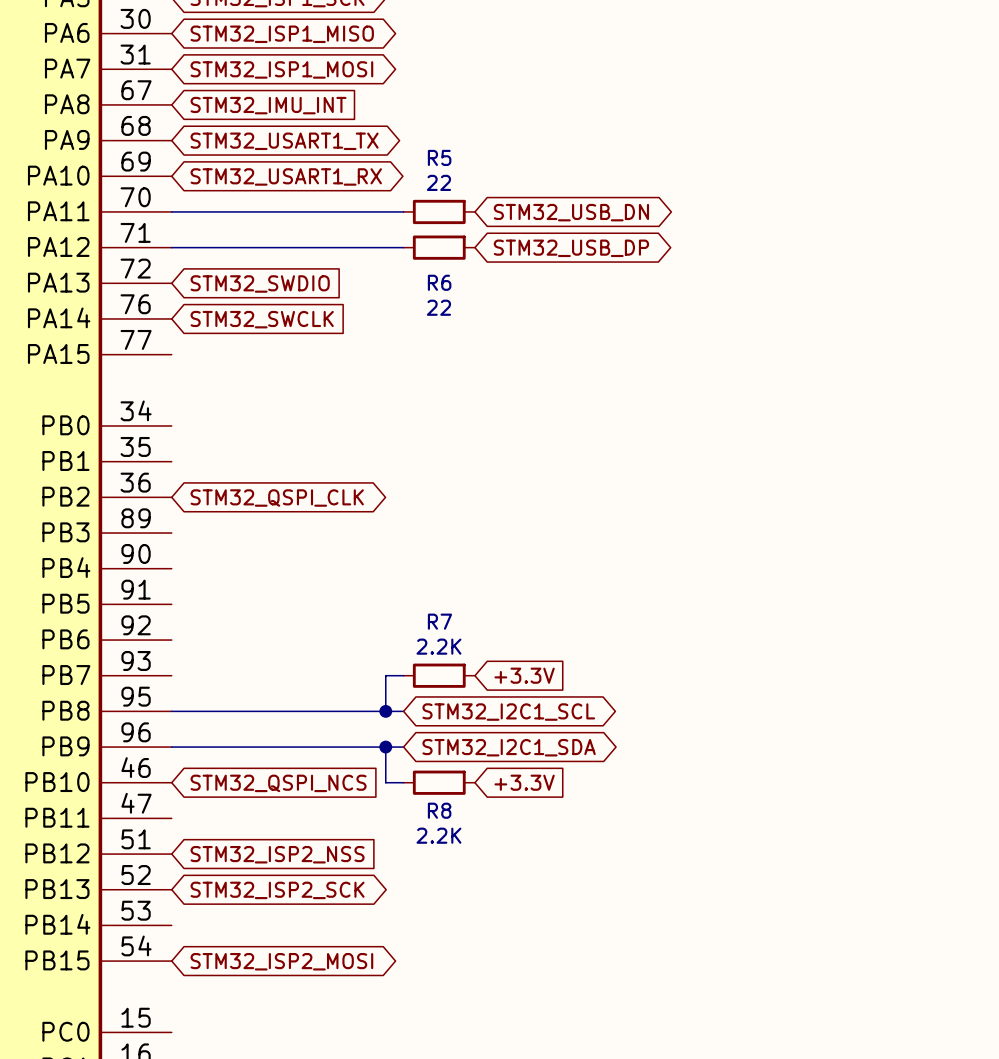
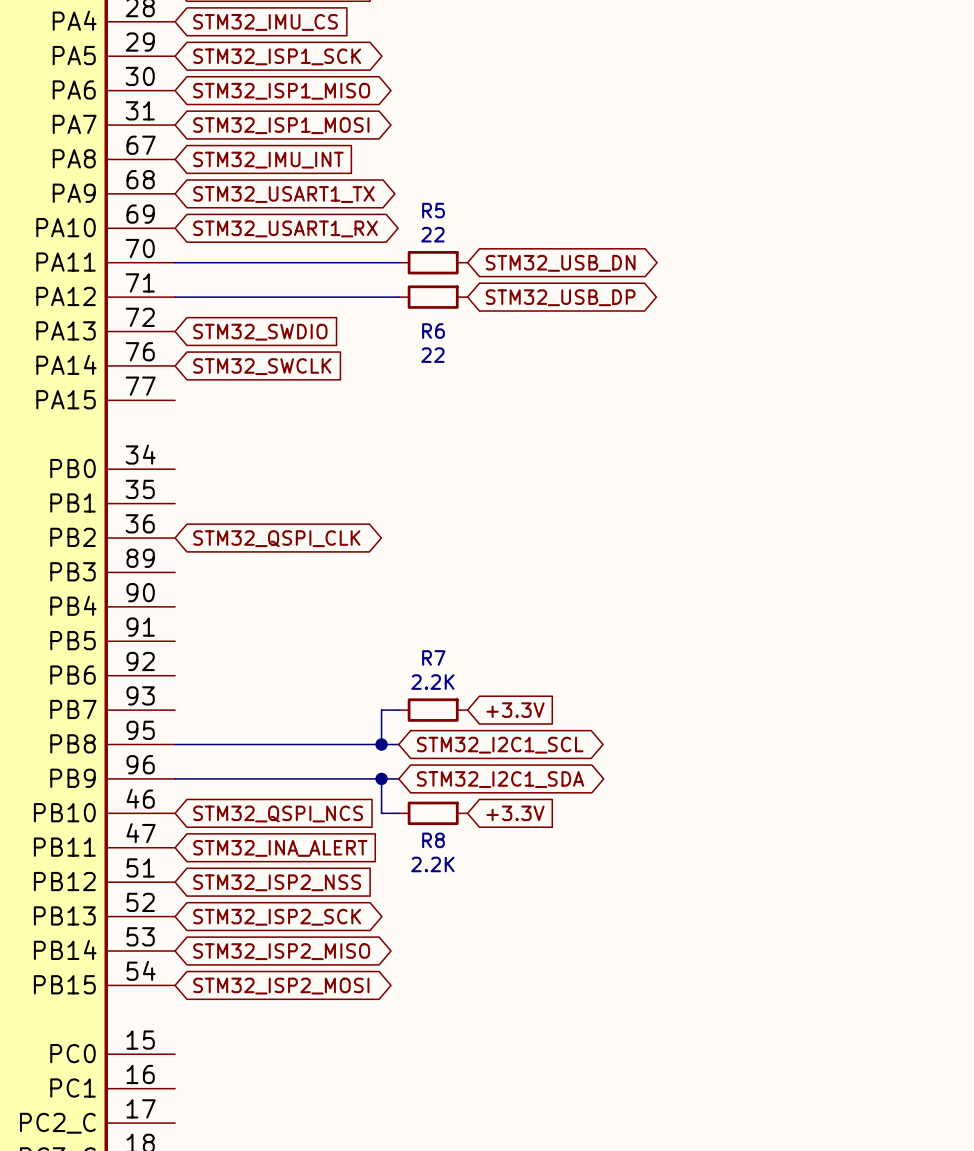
global label: none -> STM32_INA_ALERT (280, 848)
global label: none -> STM32_ISP2_MISO (281, 951)

